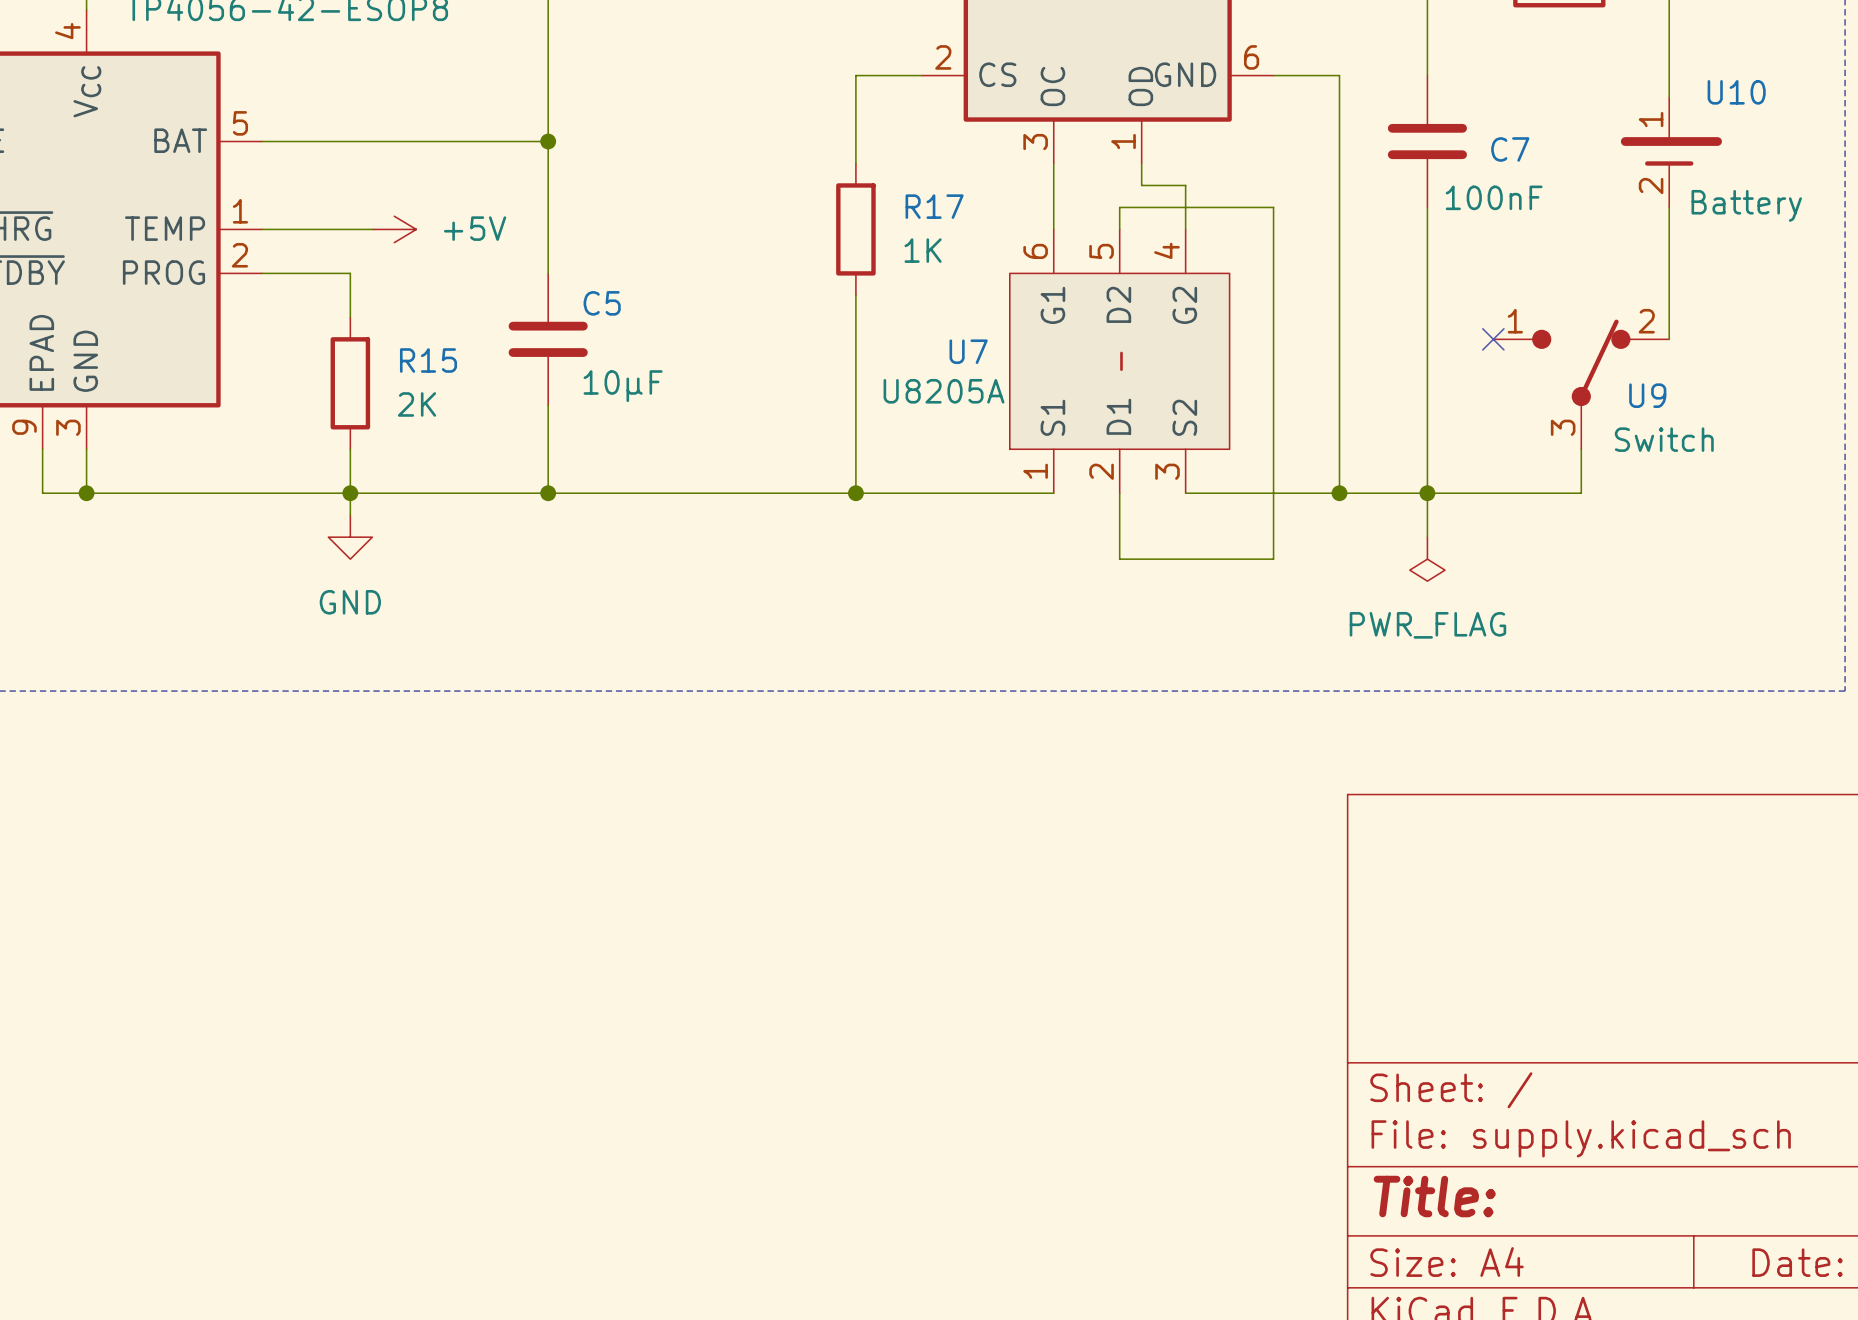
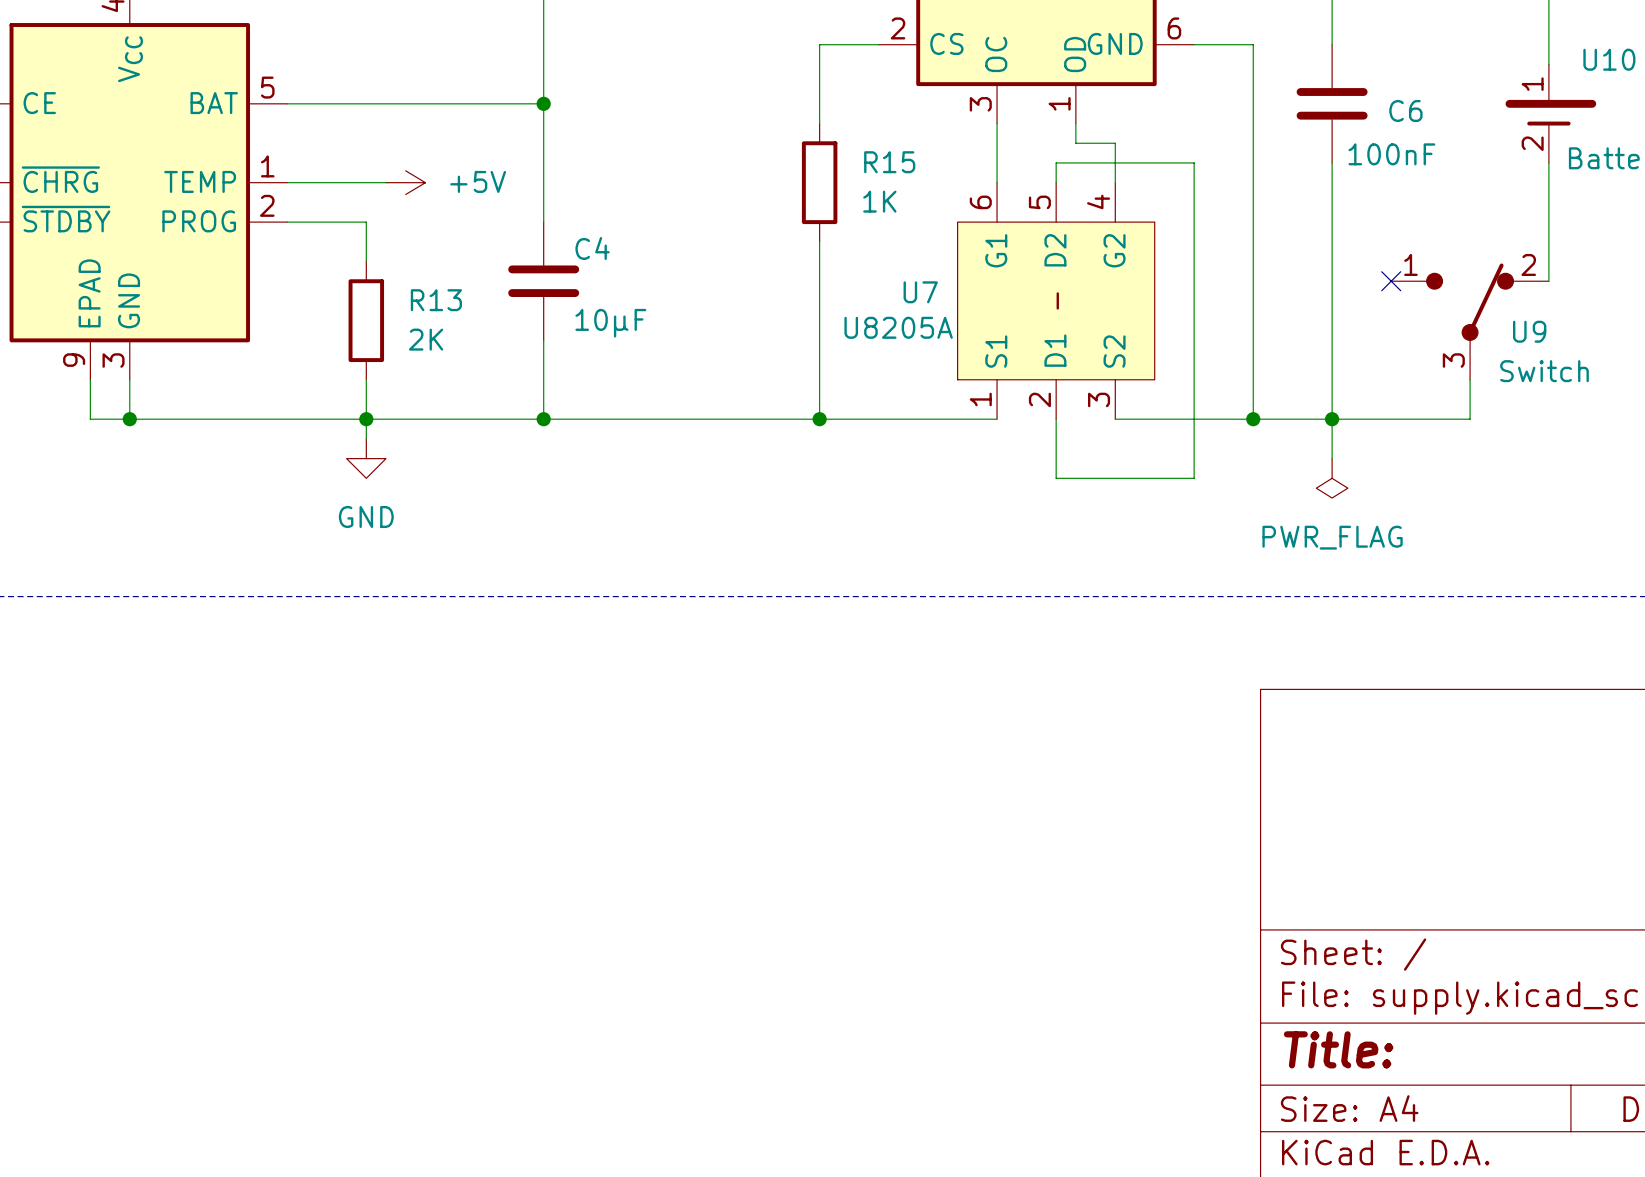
C7 name: C7 (1510, 149) -> C6 (1405, 110)
R17 name: R17 (934, 206) -> R15 (889, 162)
C5 name: C5 (602, 303) -> C4 (592, 248)
R15 name: R15 (428, 360) -> R13 (436, 300)

